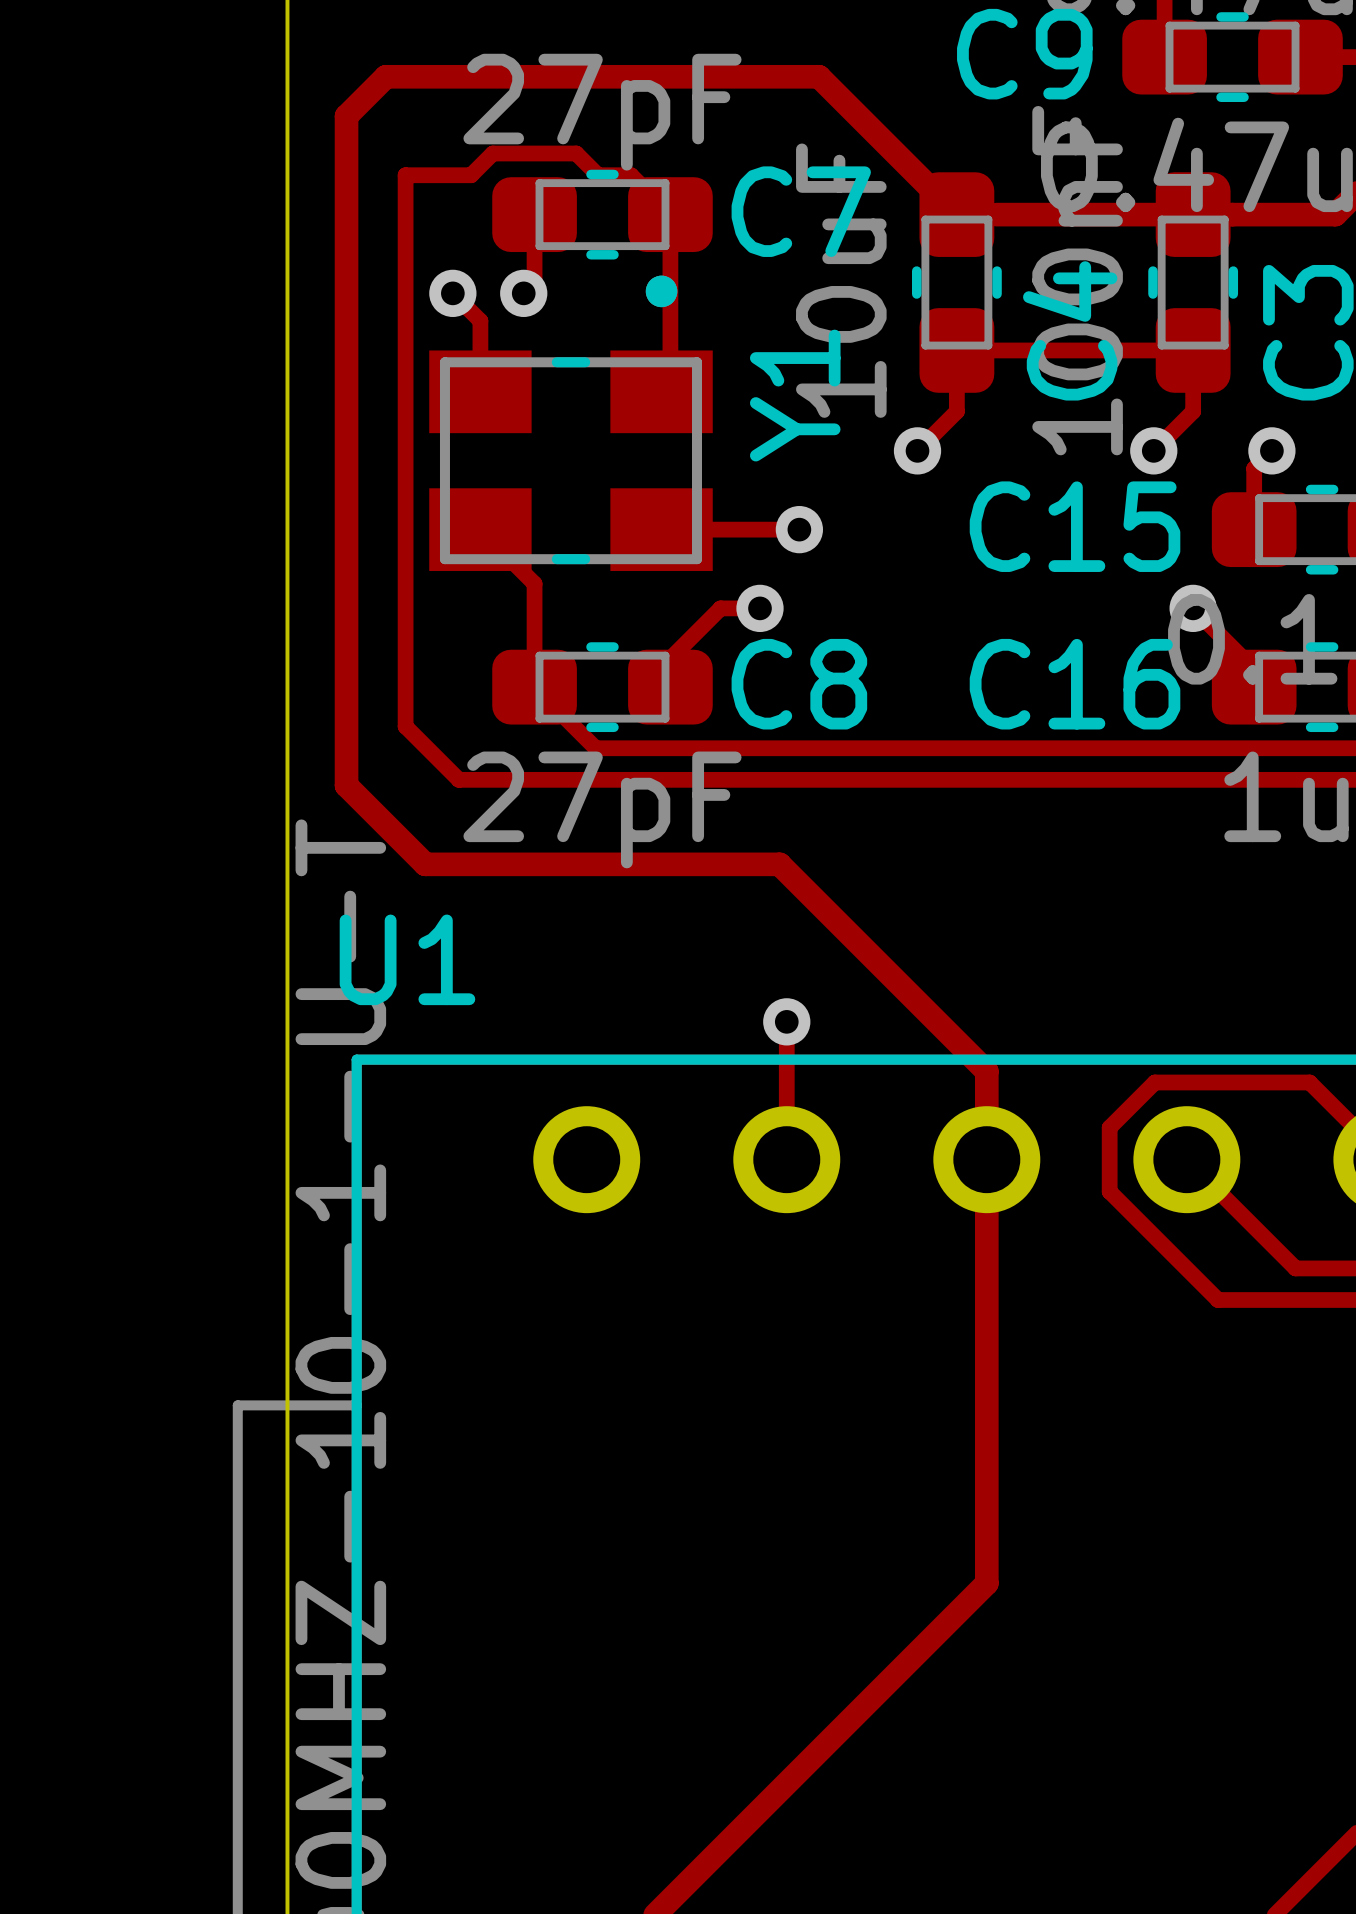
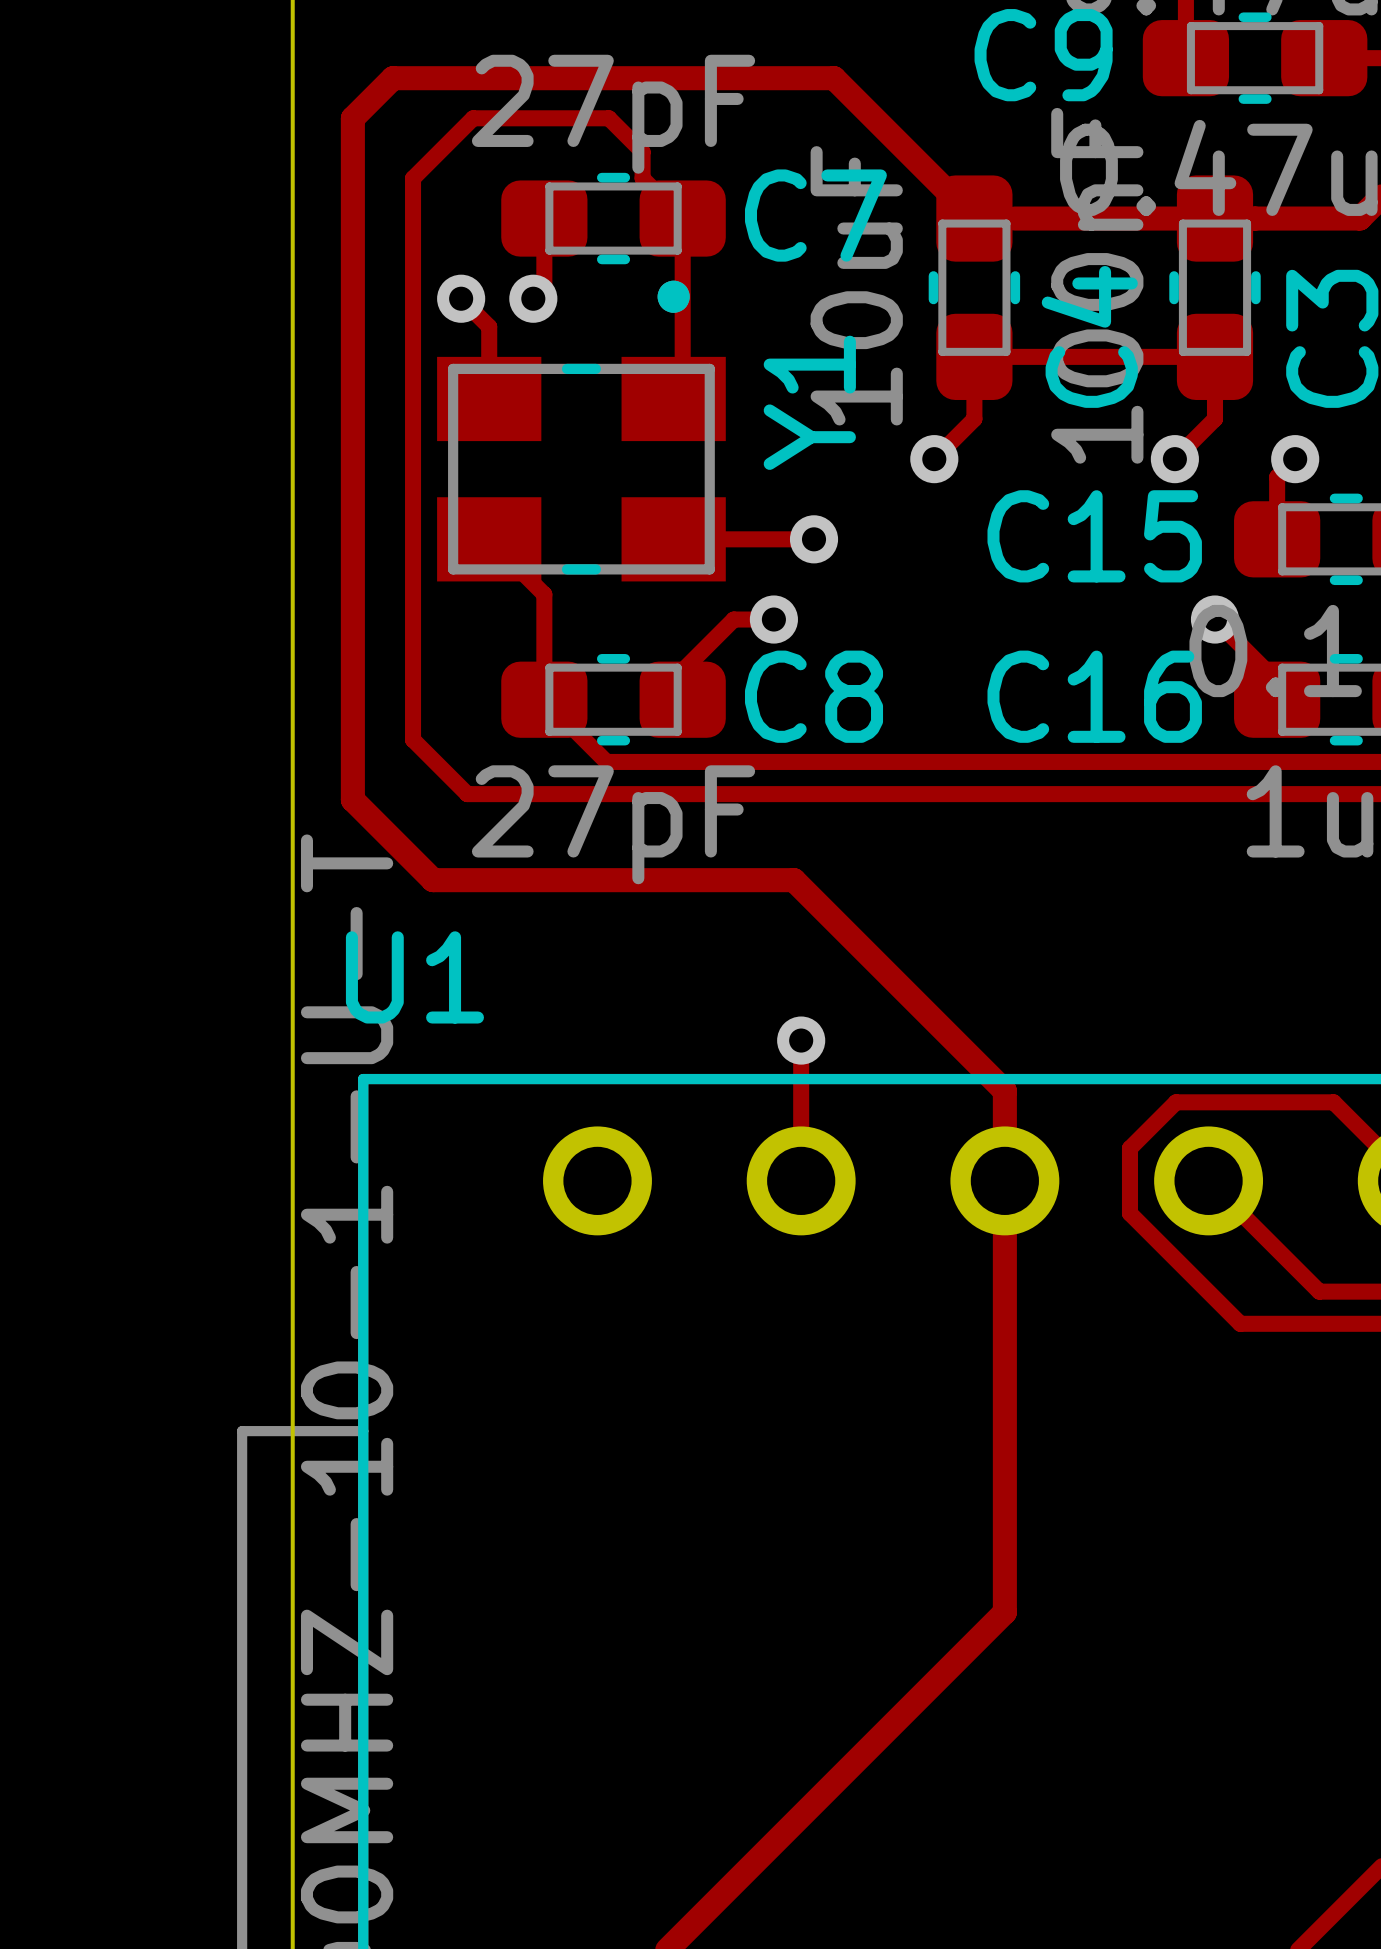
track: (405, 175) (471, 175) (492, 153) (576, 153) (598, 175) (631, 175) -> (413, 178) (473, 118) (608, 118) (642, 151) (642, 178)

